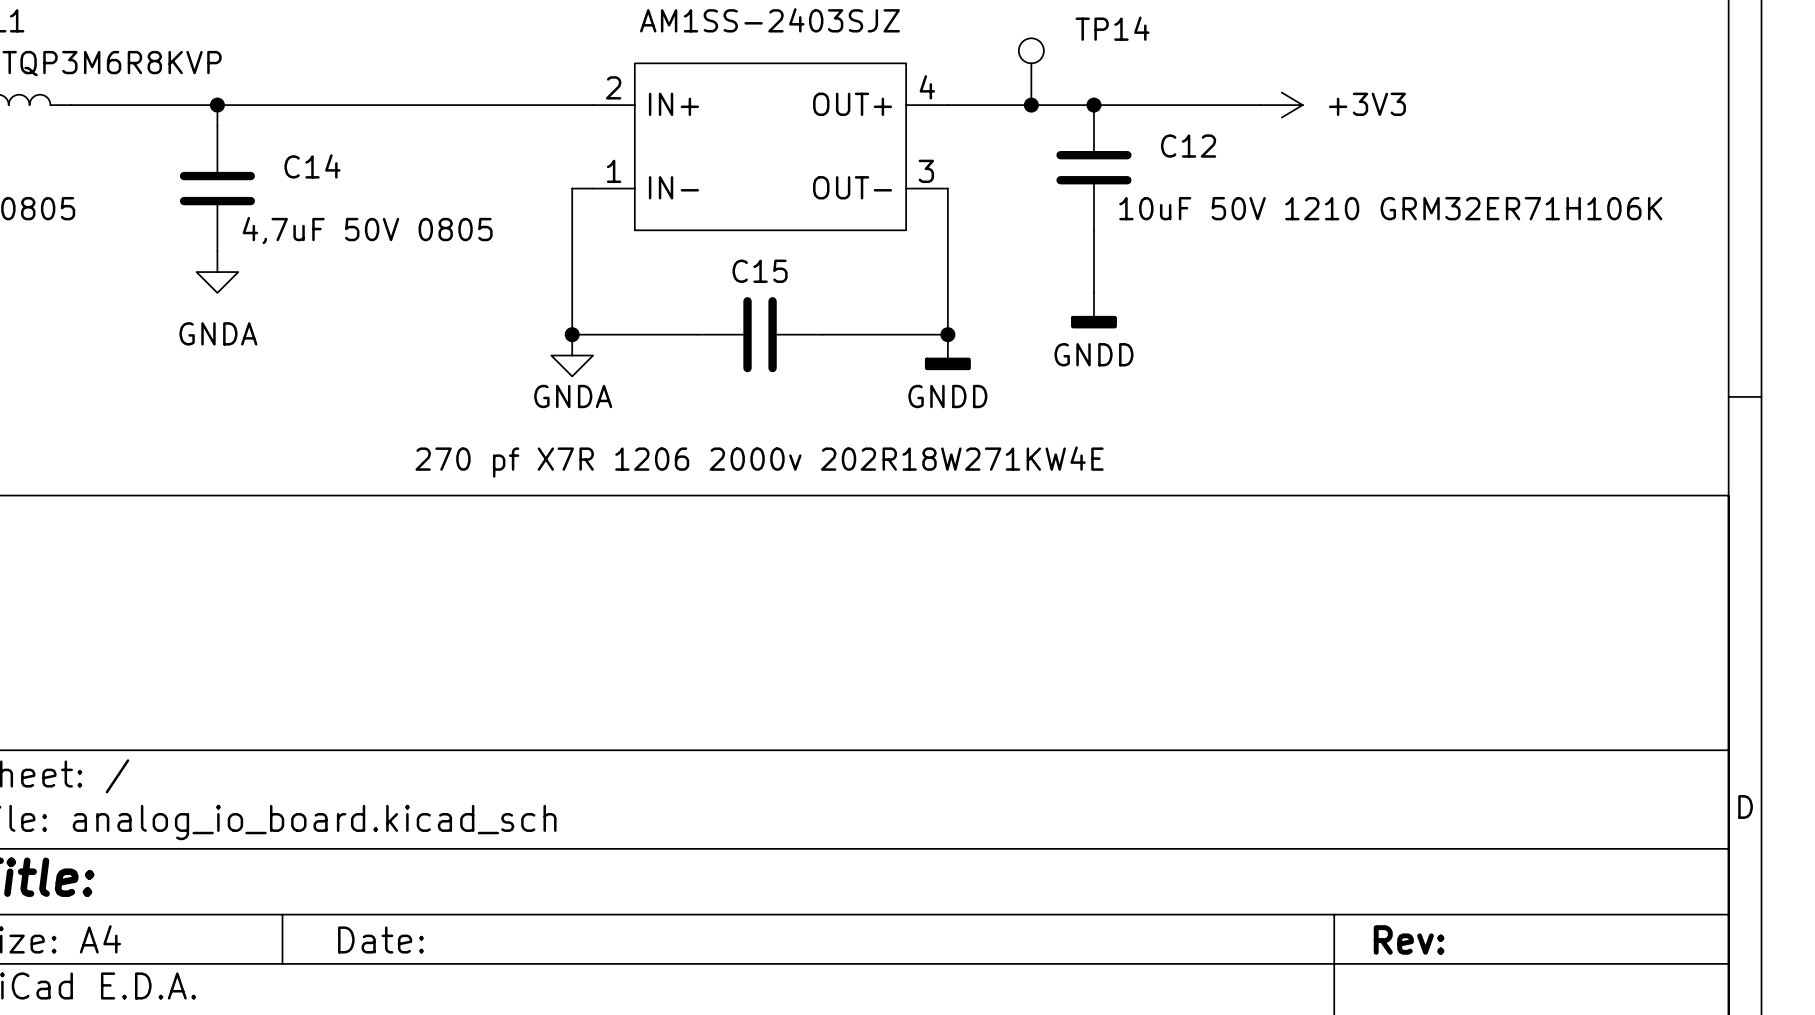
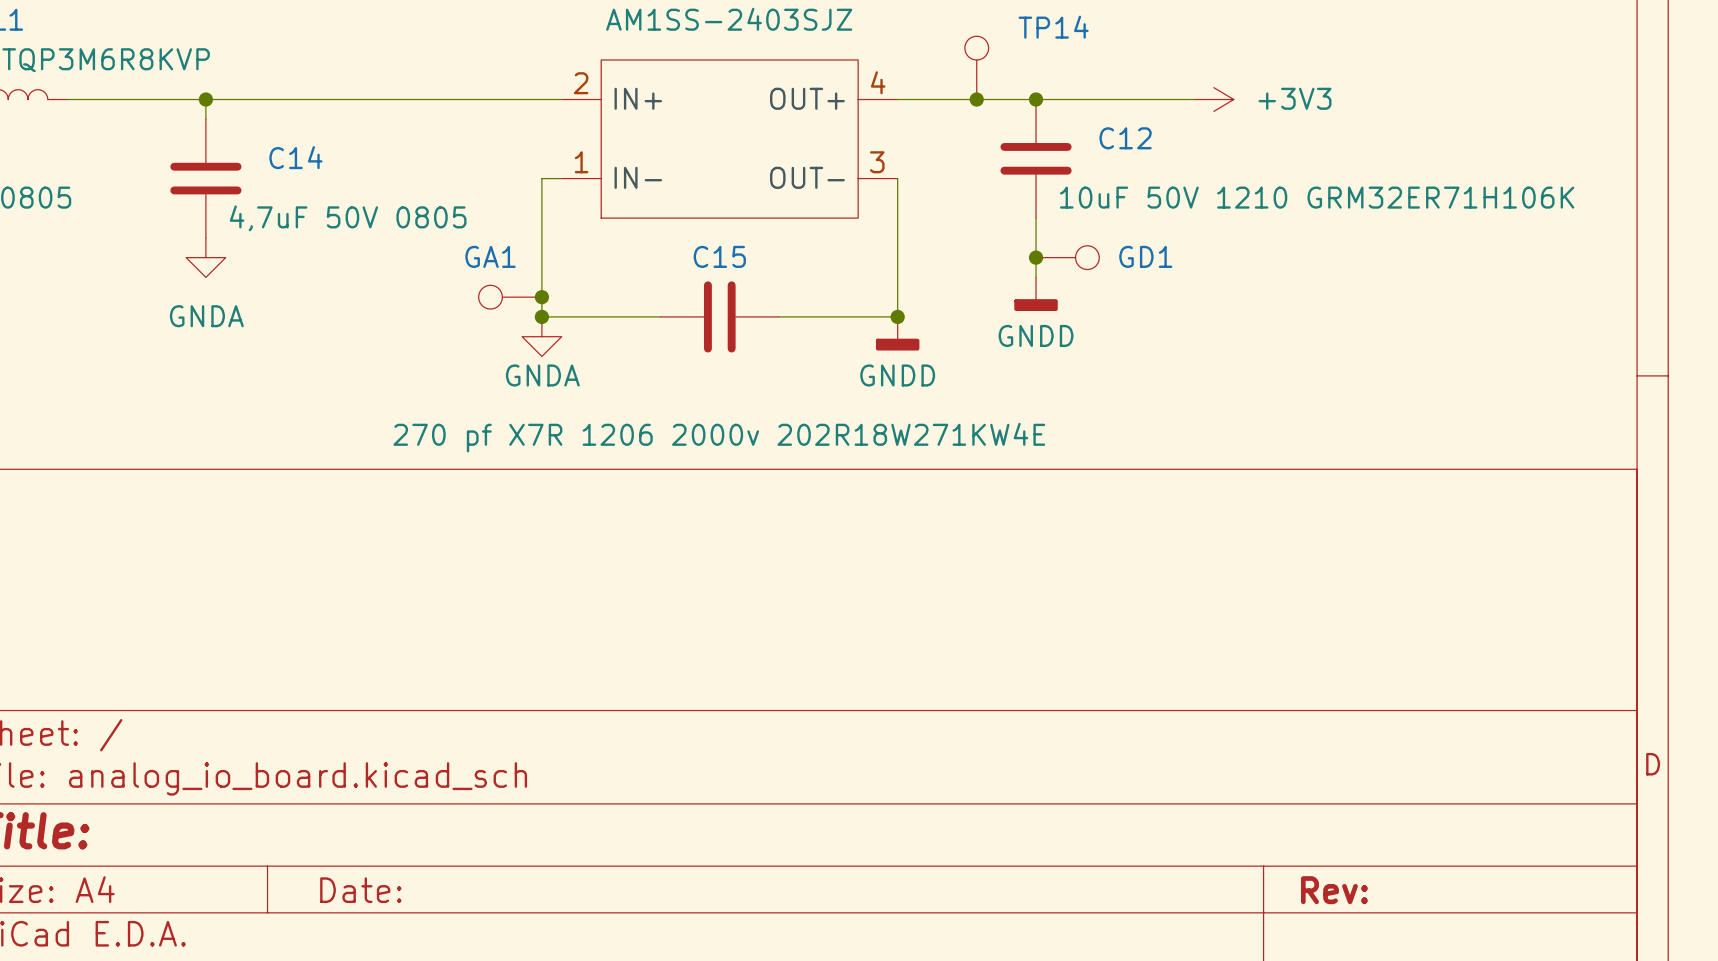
junction: none -> (1036, 257)
GD1: none -> (1067, 257)
GA1: none -> (510, 297)
junction: none -> (541, 297)

